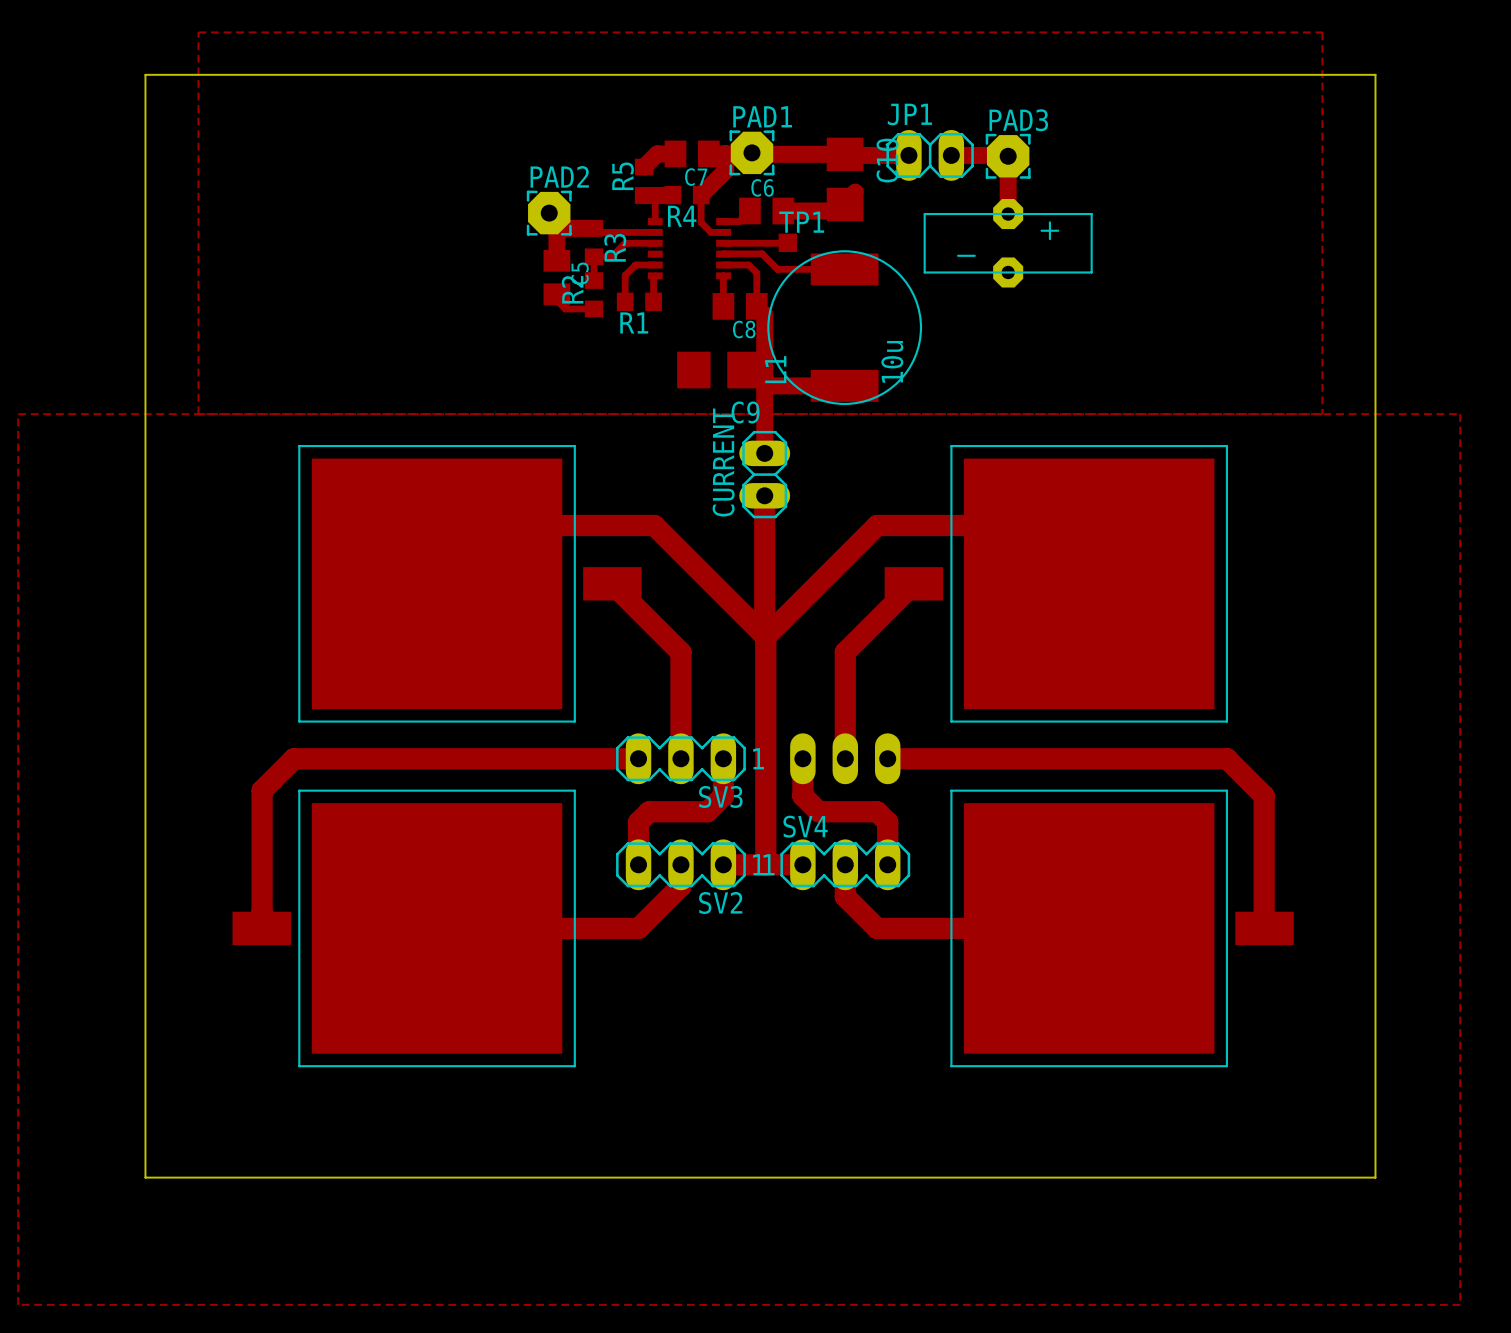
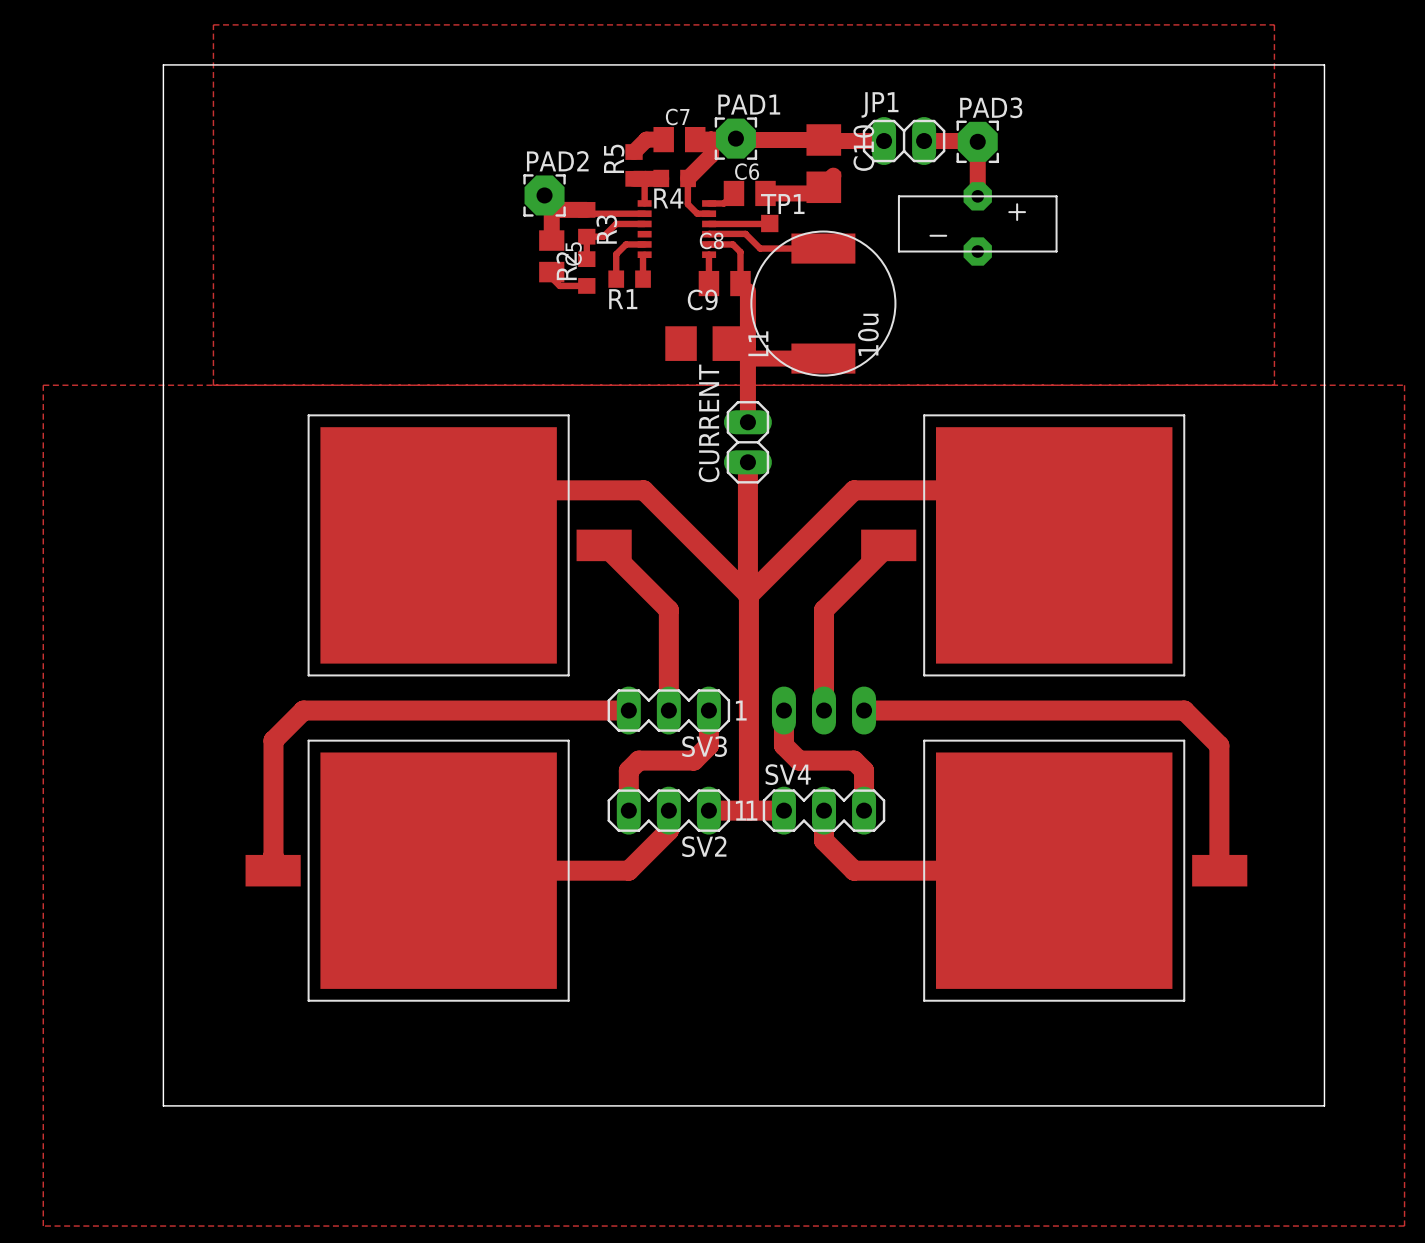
C7 name position: C7 (696, 177) -> C7 (677, 117)
C8 name position: C8 (744, 329) -> C8 (711, 240)
C9 name position: C9 (745, 412) -> C9 (702, 299)

